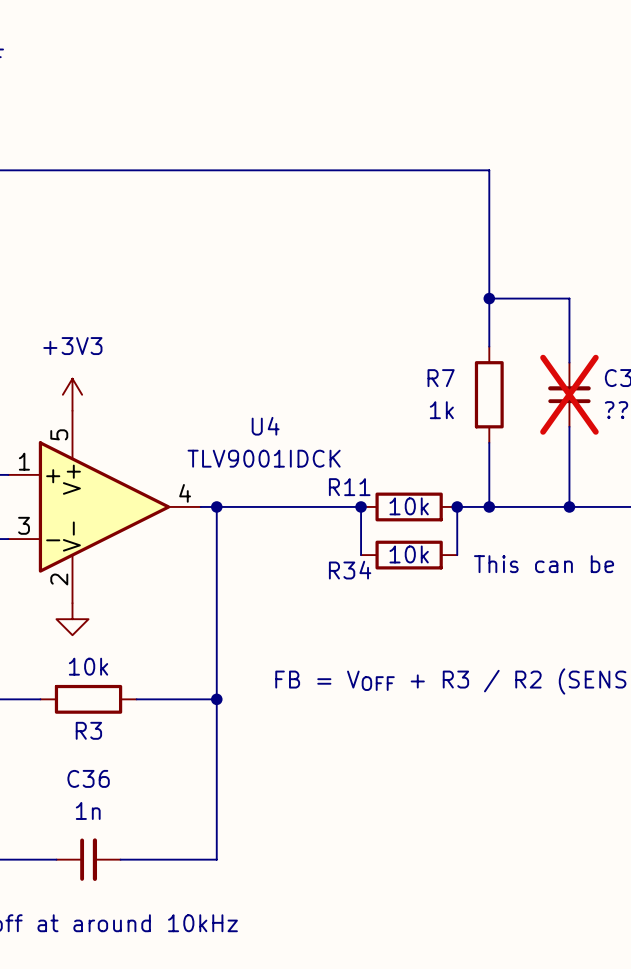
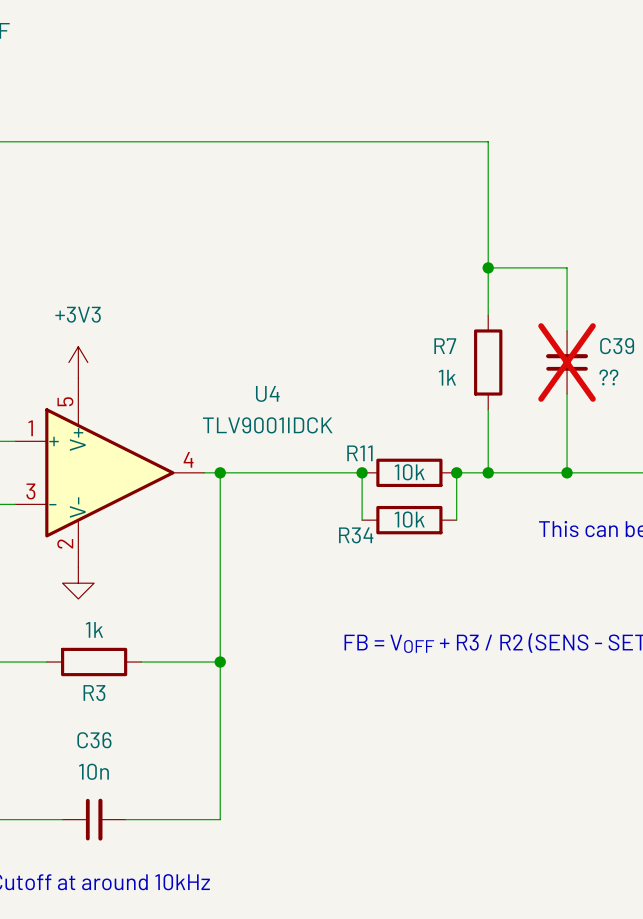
R3 value: 10k (88, 666) -> 1k (94, 629)
C36 value: 1n (88, 810) -> 10n (94, 771)

